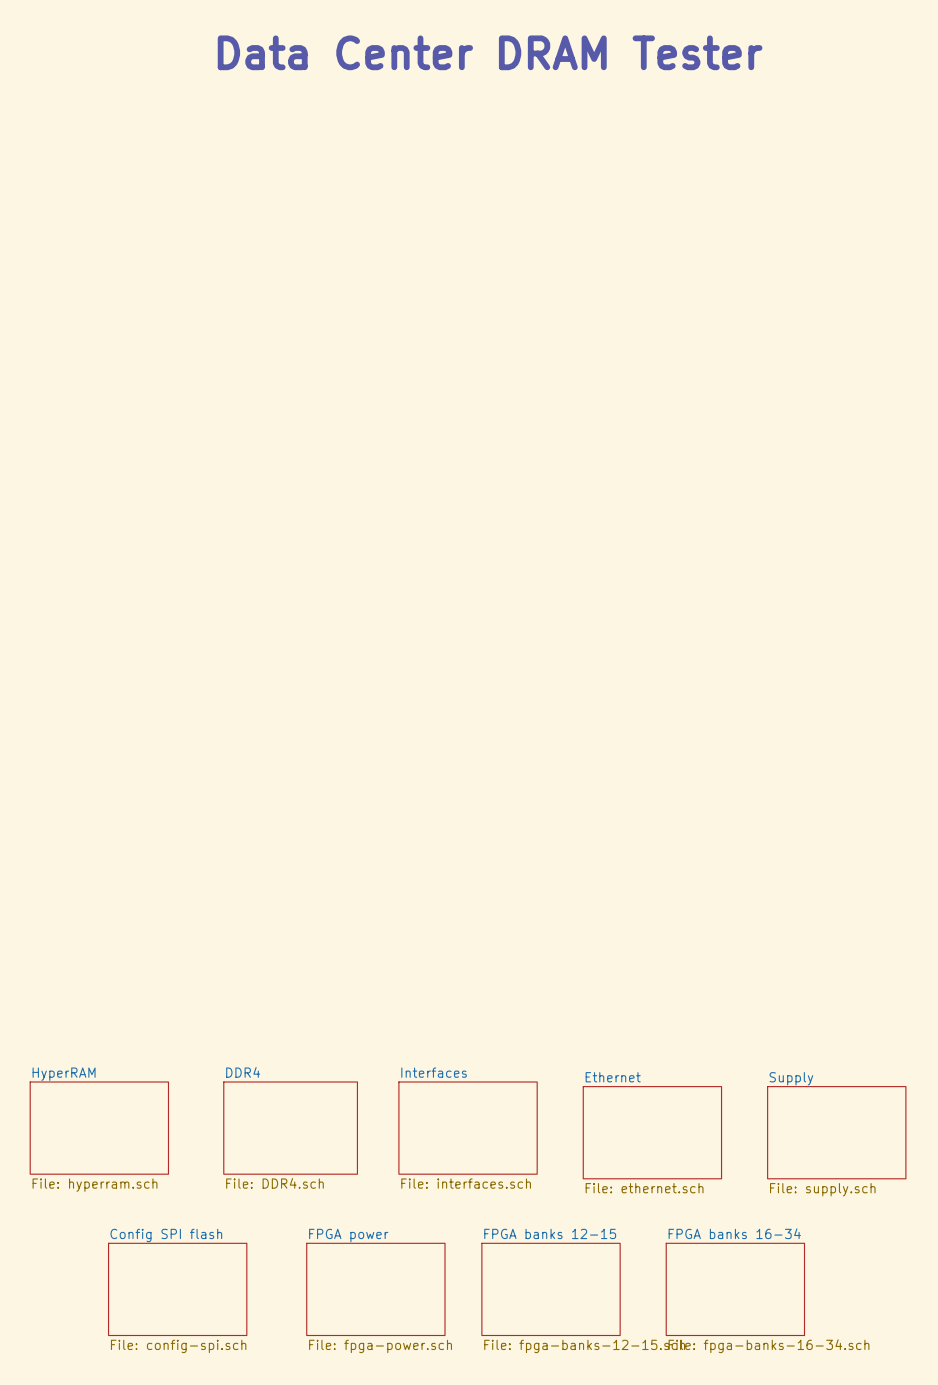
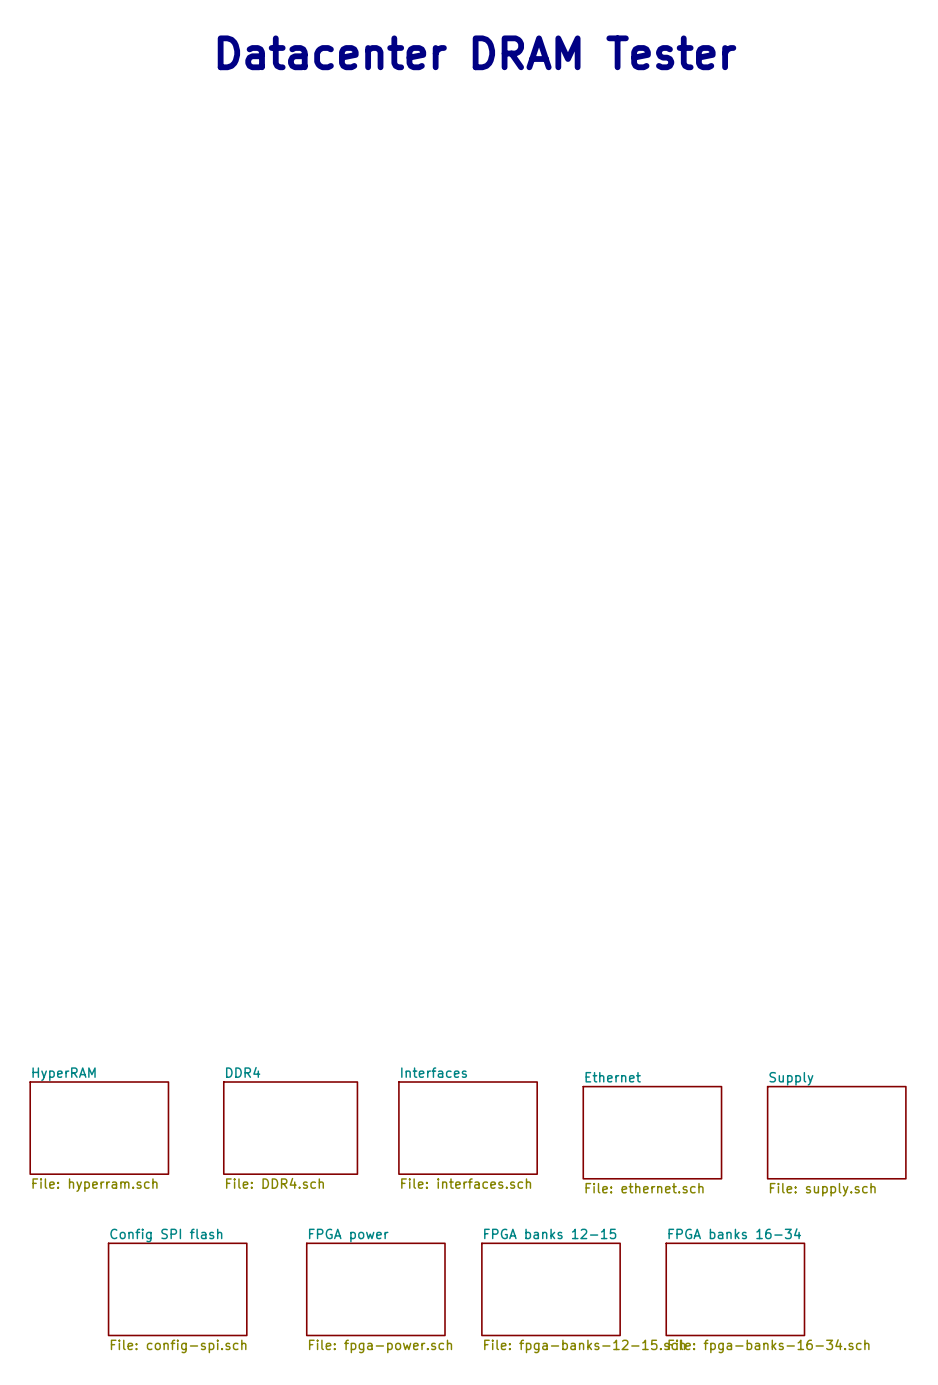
text: Data Center DRAM Tester (490, 52) -> Datacenter DRAM Tester (477, 52)

